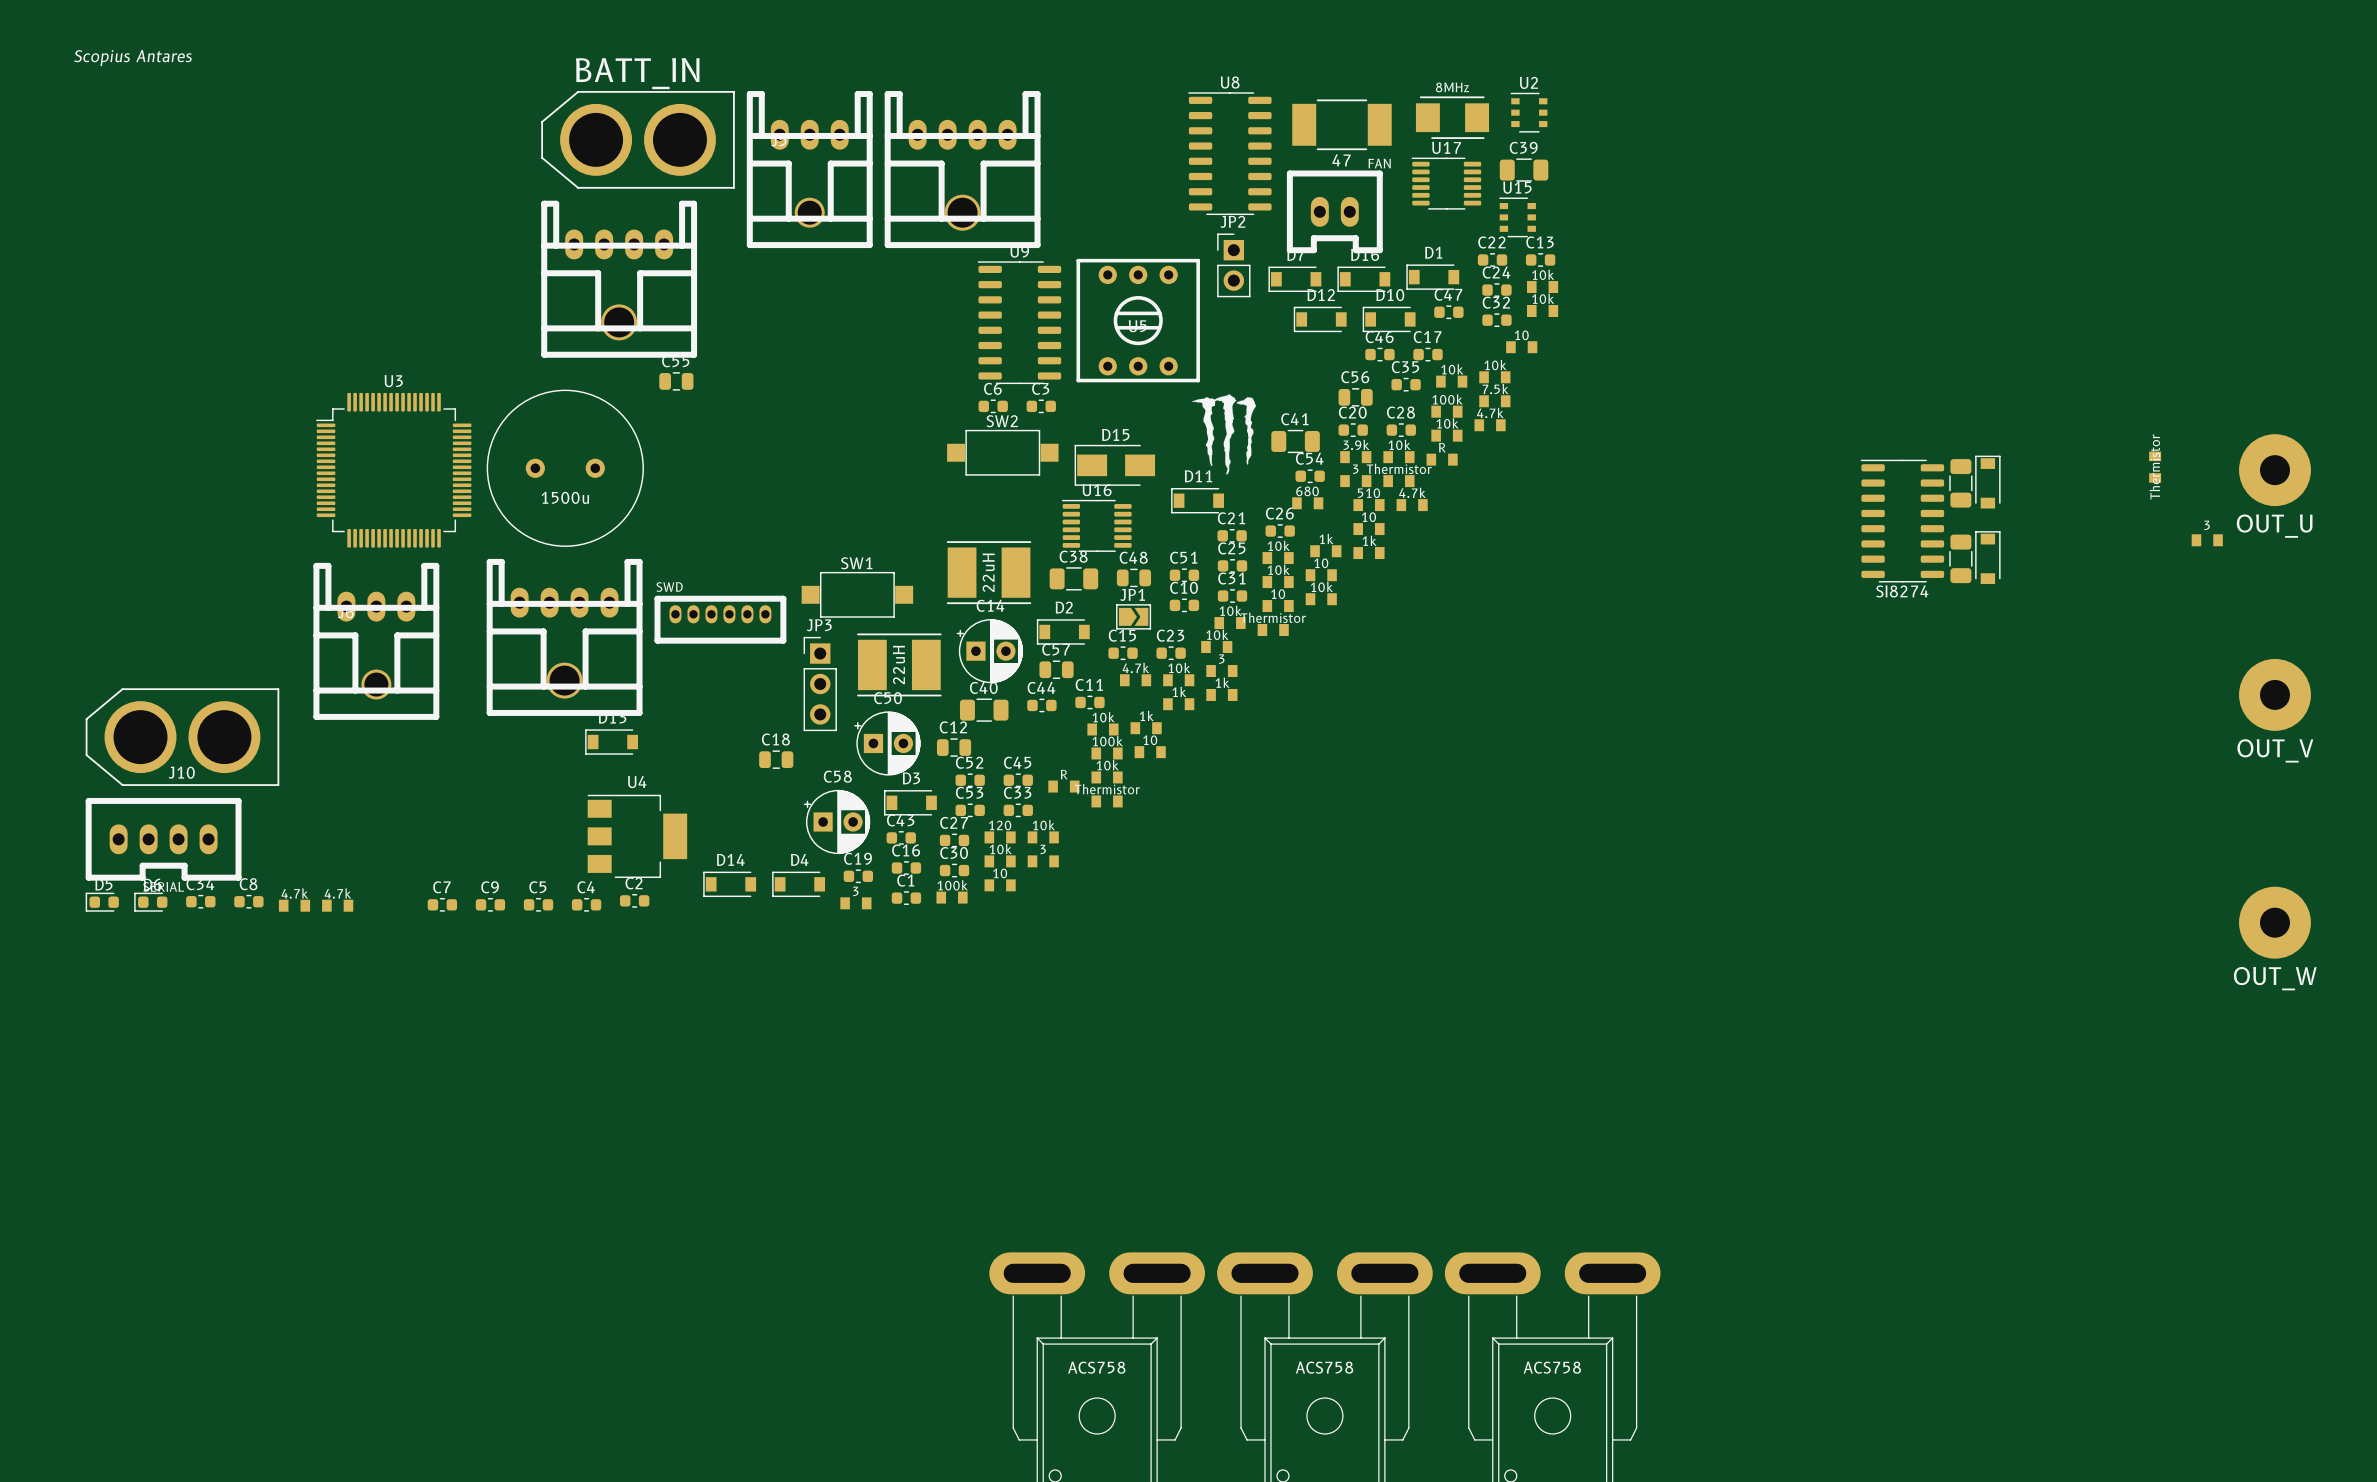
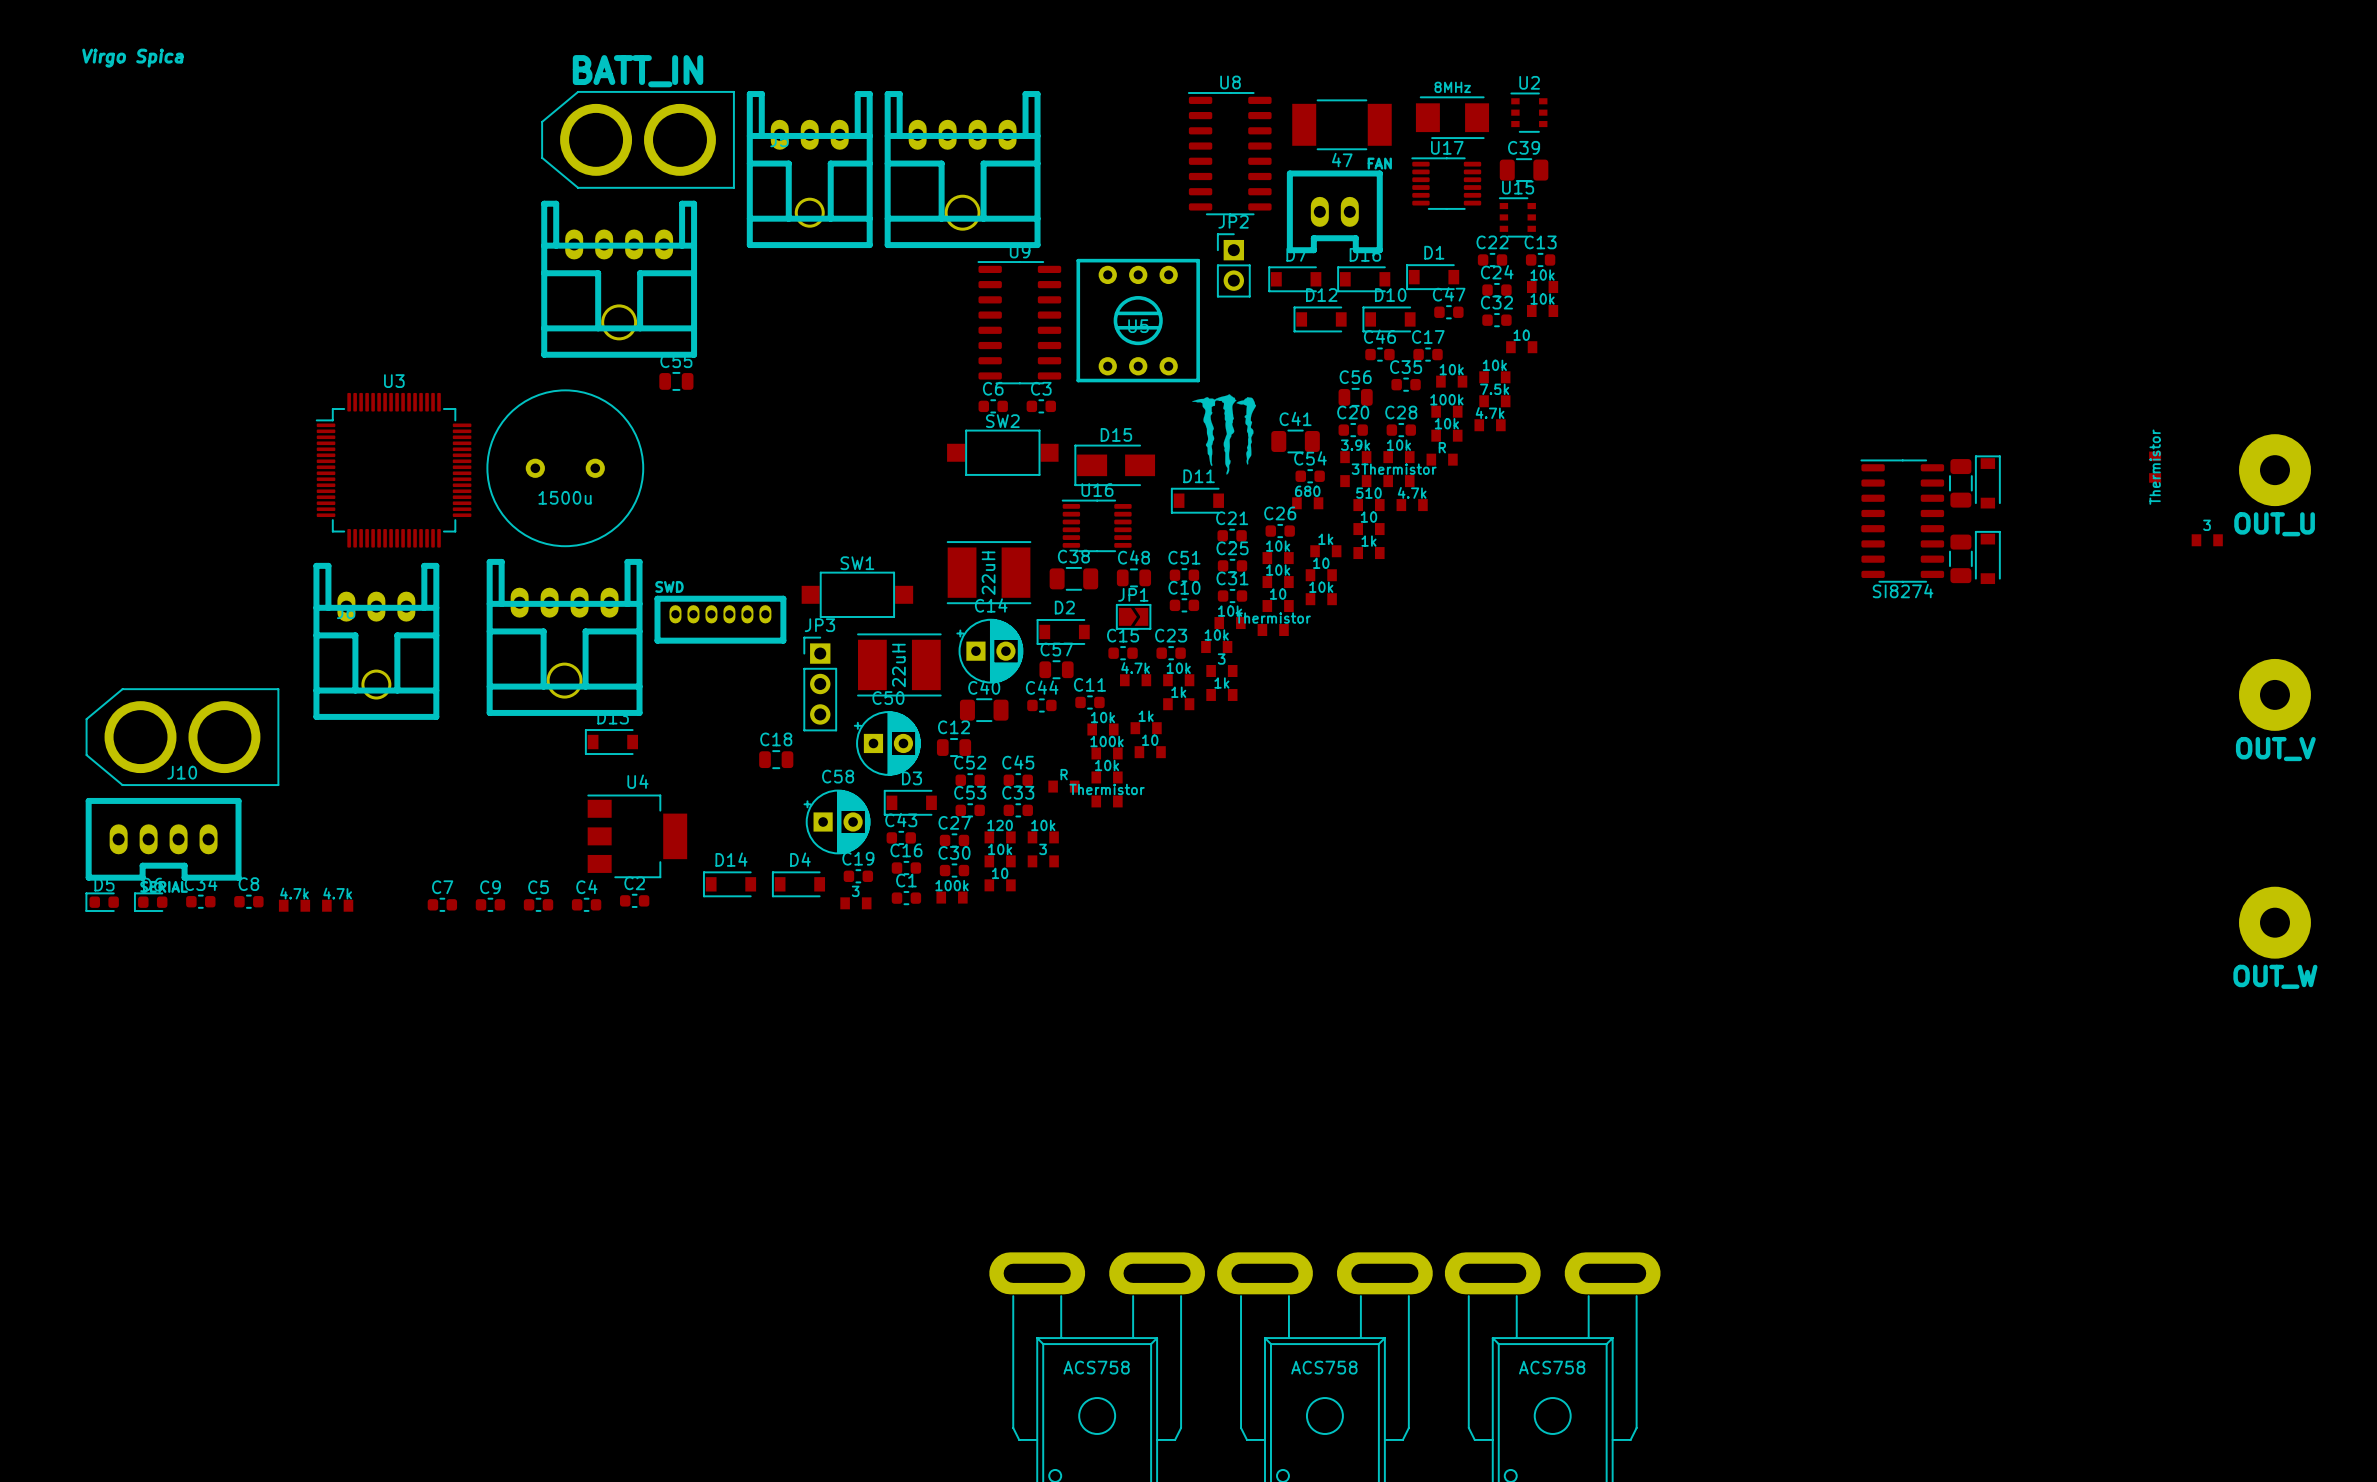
text: Scopius Antares (132, 58) -> Virgo Spica (133, 58)

